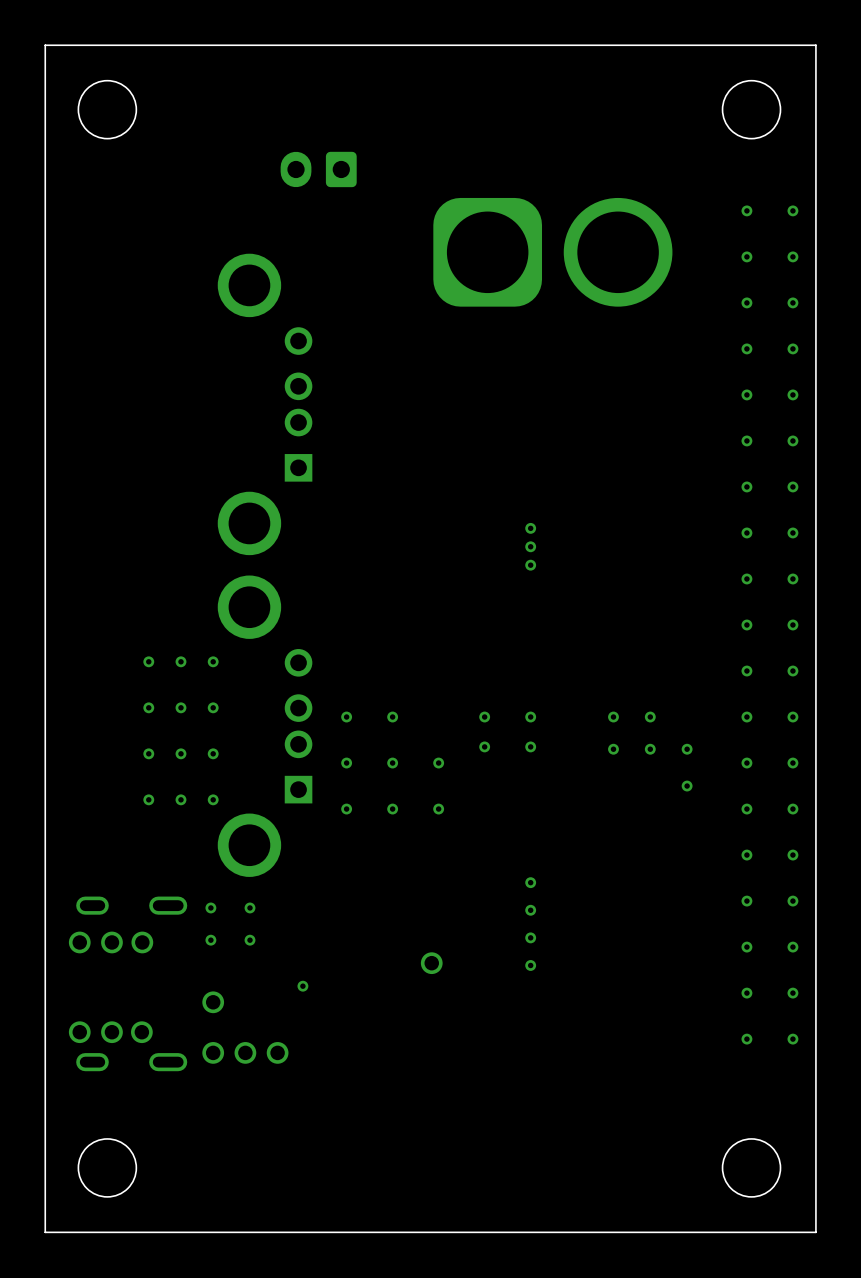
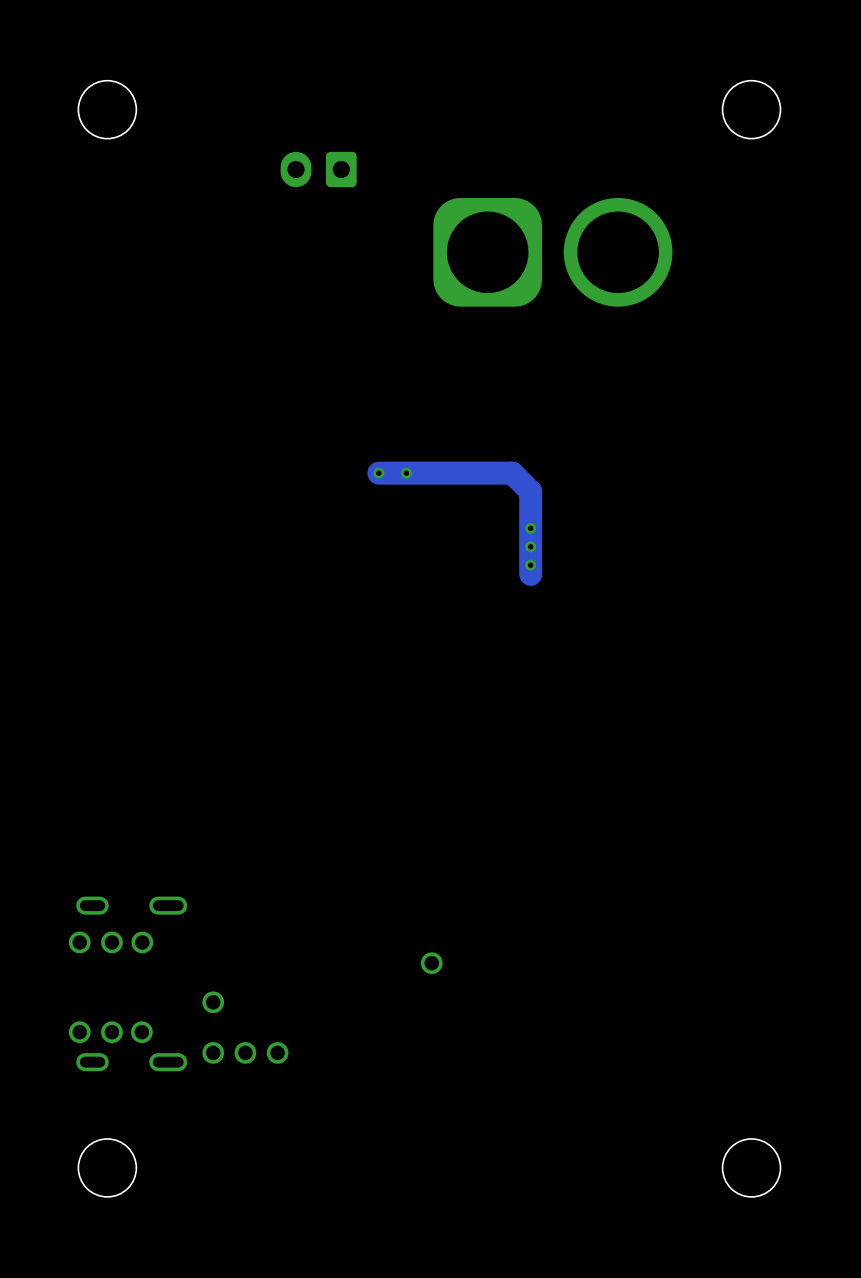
board edge: (815, 45) (45, 45) (45, 1232) (815, 1232) (815, 45) -> none
via: (746, 210) -> none
via: (792, 210) -> none
via: (746, 256) -> none
via: (792, 256) -> none
via: (746, 302) -> none
via: (792, 302) -> none
via: (746, 348) -> none
via: (792, 348) -> none
via: (746, 394) -> none
via: (792, 394) -> none
part: (265, 404) -> none
via: (746, 440) -> none
via: (792, 440) -> none
track: none -> (378, 473) (512, 473) (530, 491) (530, 574)
via: none -> (378, 473)
via: none -> (406, 473)
via: (746, 486) -> none
via: (792, 486) -> none
via: (746, 532) -> none
via: (792, 532) -> none
via: (746, 578) -> none
via: (792, 578) -> none
via: (746, 624) -> none
via: (792, 624) -> none
via: (148, 661) -> none
via: (180, 661) -> none
via: (213, 661) -> none
via: (746, 671) -> none
via: (792, 671) -> none
via: (148, 707) -> none
via: (180, 707) -> none
via: (213, 707) -> none
via: (346, 717) -> none
via: (392, 717) -> none
via: (484, 717) -> none
via: (530, 717) -> none
via: (613, 717) -> none
via: (650, 717) -> none
via: (746, 717) -> none
via: (792, 717) -> none
part: (265, 726) -> none
via: (484, 746) -> none
via: (530, 746) -> none
via: (613, 749) -> none
via: (650, 749) -> none
via: (687, 749) -> none
via: (148, 753) -> none
via: (180, 753) -> none
via: (213, 753) -> none
via: (346, 763) -> none
via: (392, 763) -> none
via: (438, 763) -> none
via: (746, 763) -> none
via: (792, 763) -> none
via: (687, 786) -> none
via: (148, 799) -> none
via: (180, 799) -> none
via: (213, 799) -> none
via: (346, 809) -> none
via: (392, 809) -> none
via: (438, 809) -> none
via: (746, 809) -> none
via: (792, 809) -> none
via: (746, 855) -> none
via: (792, 855) -> none
via: (530, 882) -> none
via: (746, 901) -> none
via: (792, 901) -> none
via: (210, 907) -> none
via: (250, 907) -> none
via: (530, 910) -> none
via: (530, 937) -> none
via: (210, 940) -> none
via: (250, 940) -> none
via: (746, 947) -> none
via: (792, 947) -> none
via: (530, 965) -> none
via: (302, 986) -> none
via: (746, 993) -> none
via: (792, 993) -> none
via: (746, 1039) -> none
via: (792, 1039) -> none

